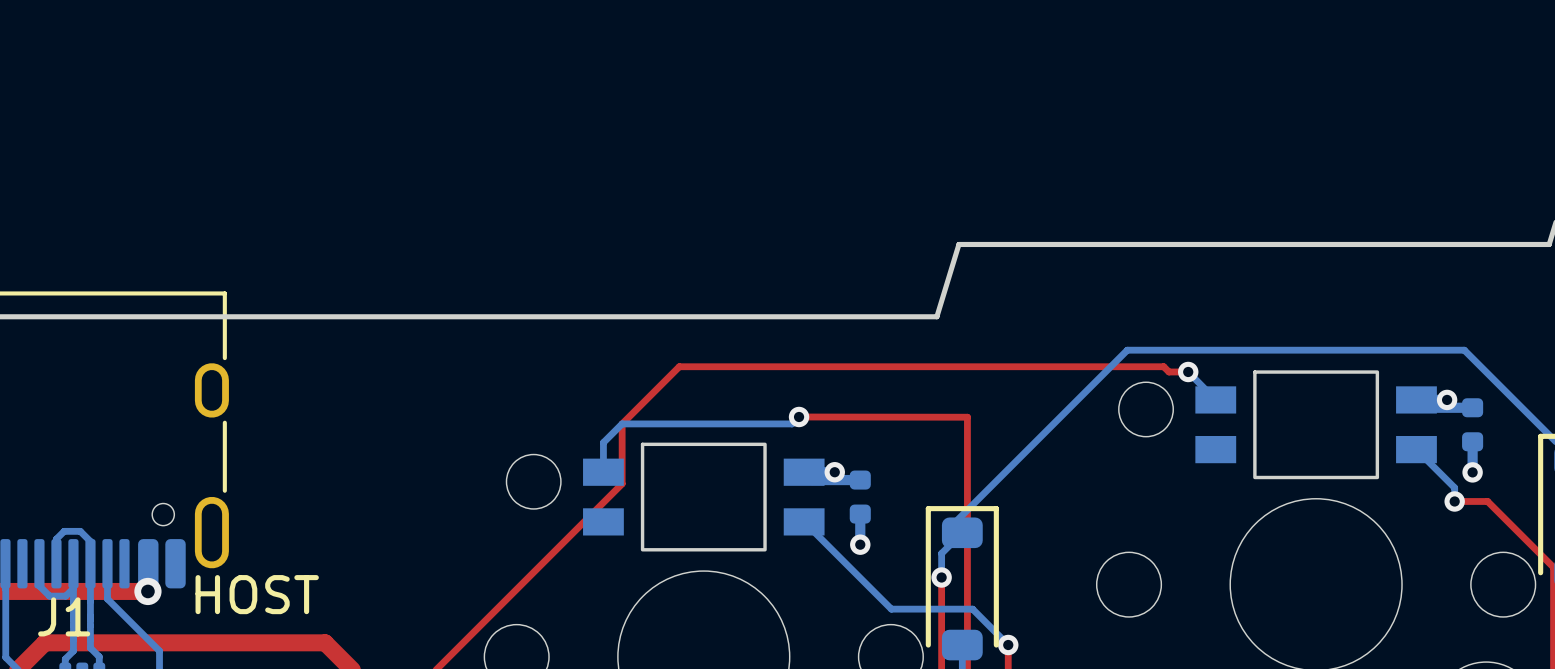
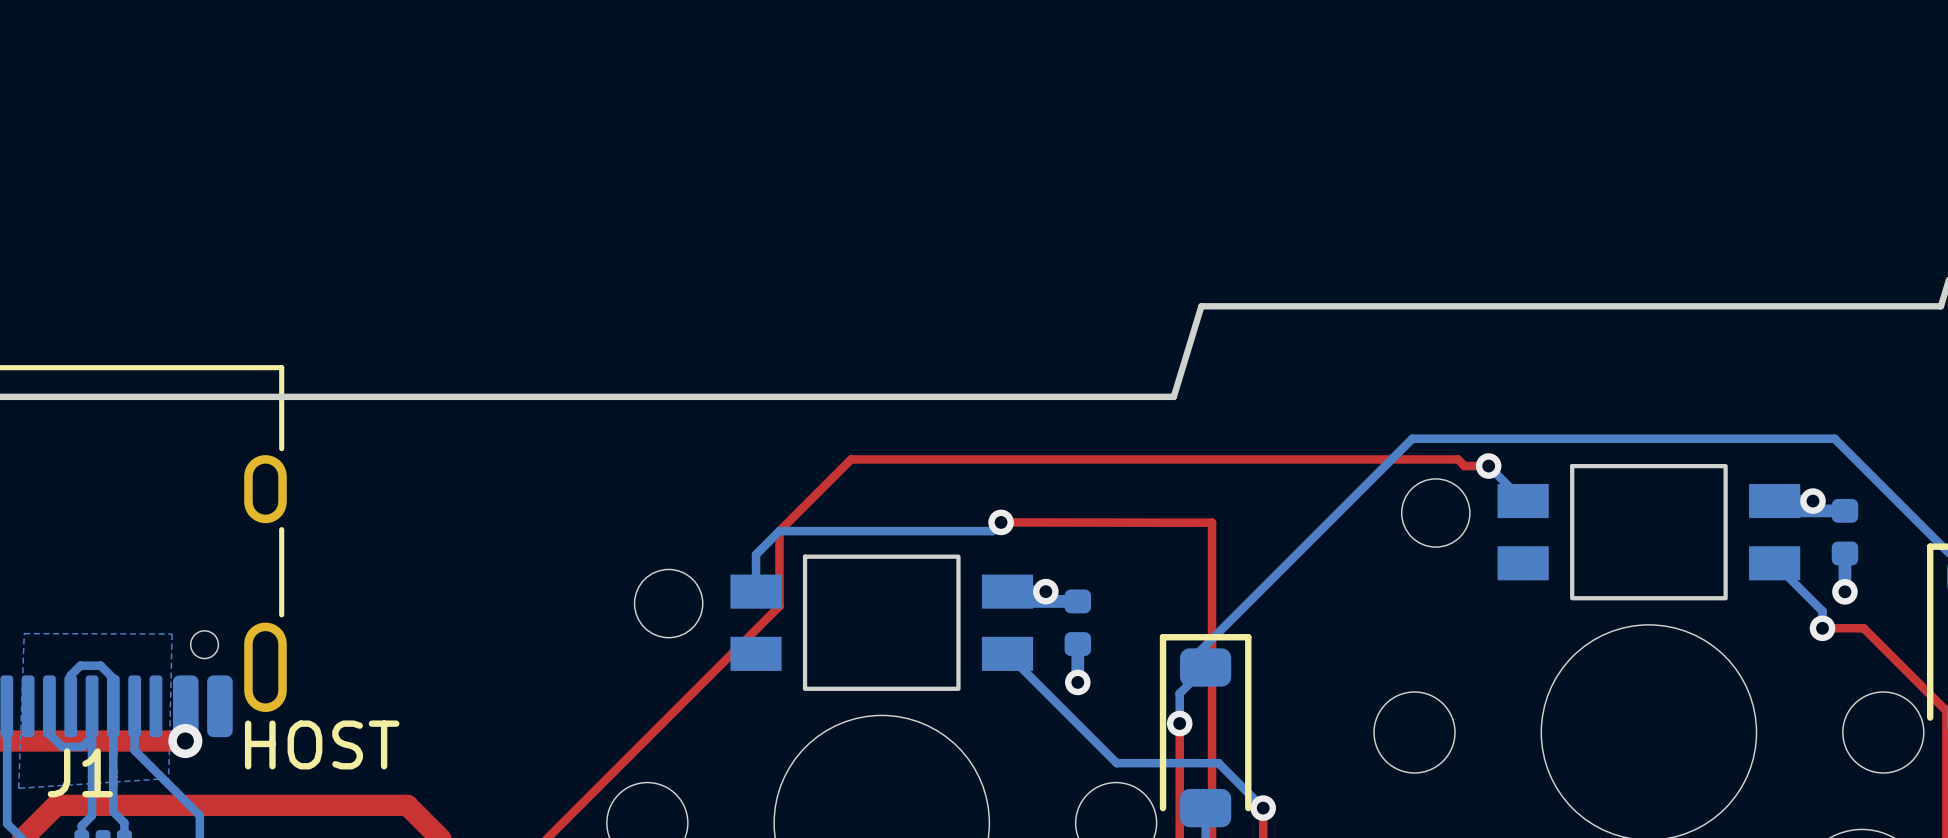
bottom zone outline: none -> (24, 633) (18, 788) (168, 778) (172, 634) (24, 633)

